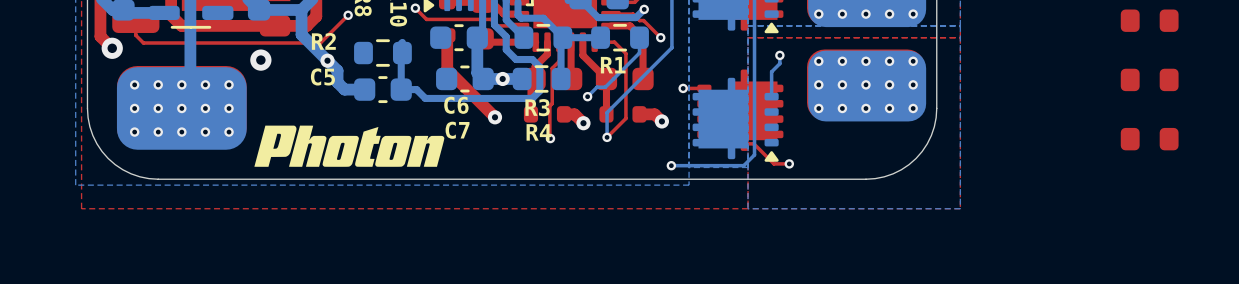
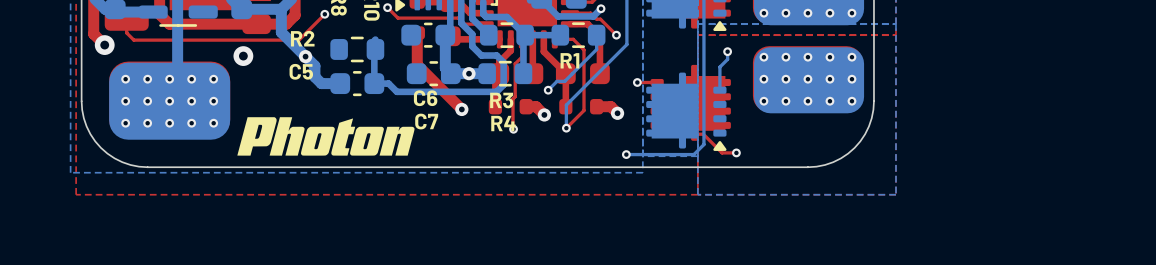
part: (1149, 20) -> none
part: (1149, 79) -> none
part: (1149, 139) -> none

